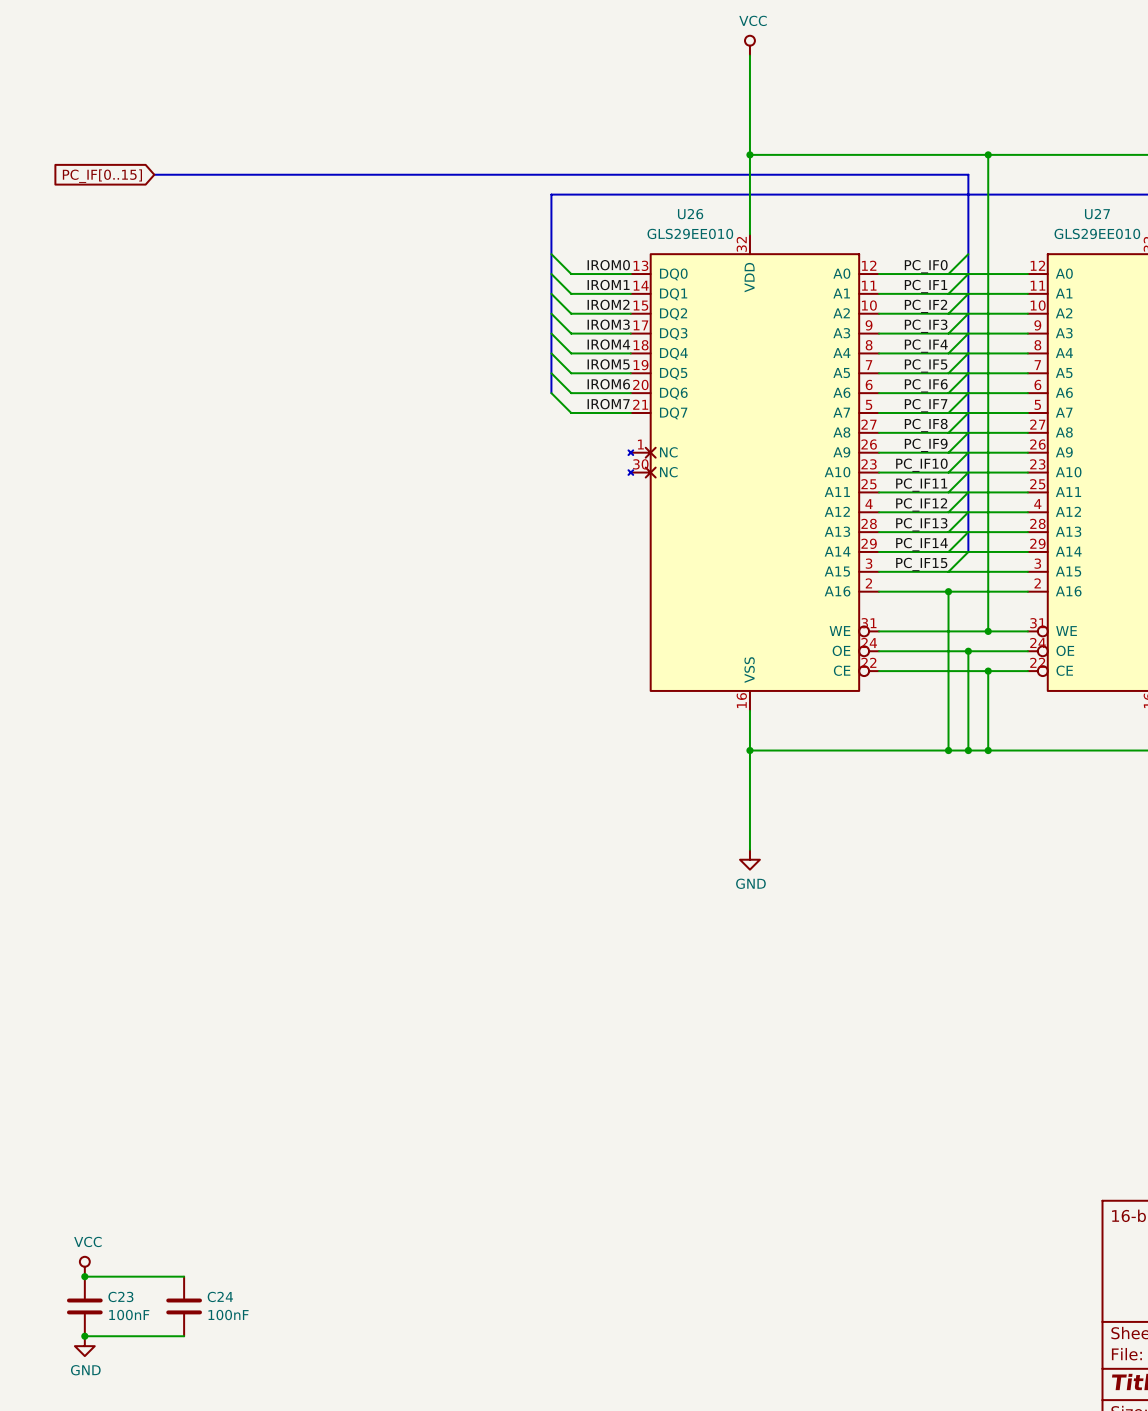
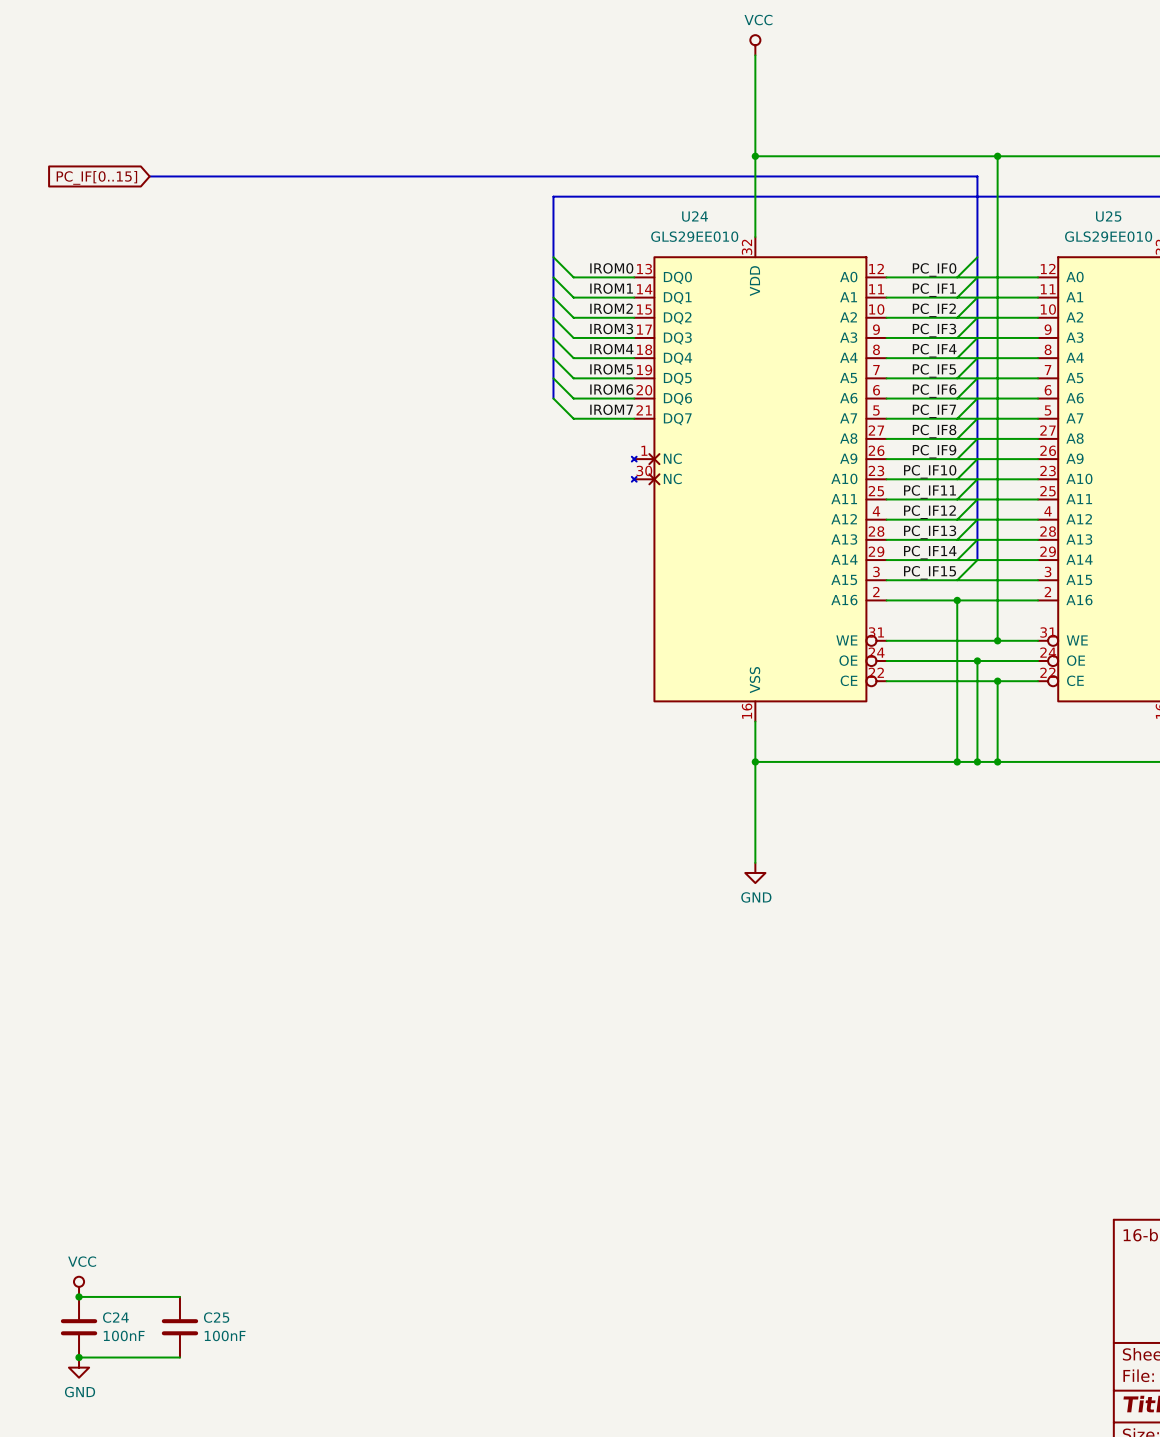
U26 name: U26 (690, 214) -> U24 (695, 216)
U27 name: U27 (1097, 214) -> U25 (1108, 216)
C23 name: C23 (120, 1296) -> C24 (115, 1317)
C24 name: C24 (220, 1296) -> C25 (216, 1317)

